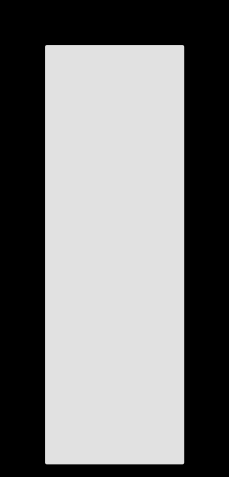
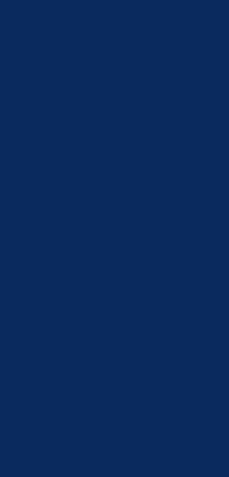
drawing: [45, 45, 185, 465] -> none

